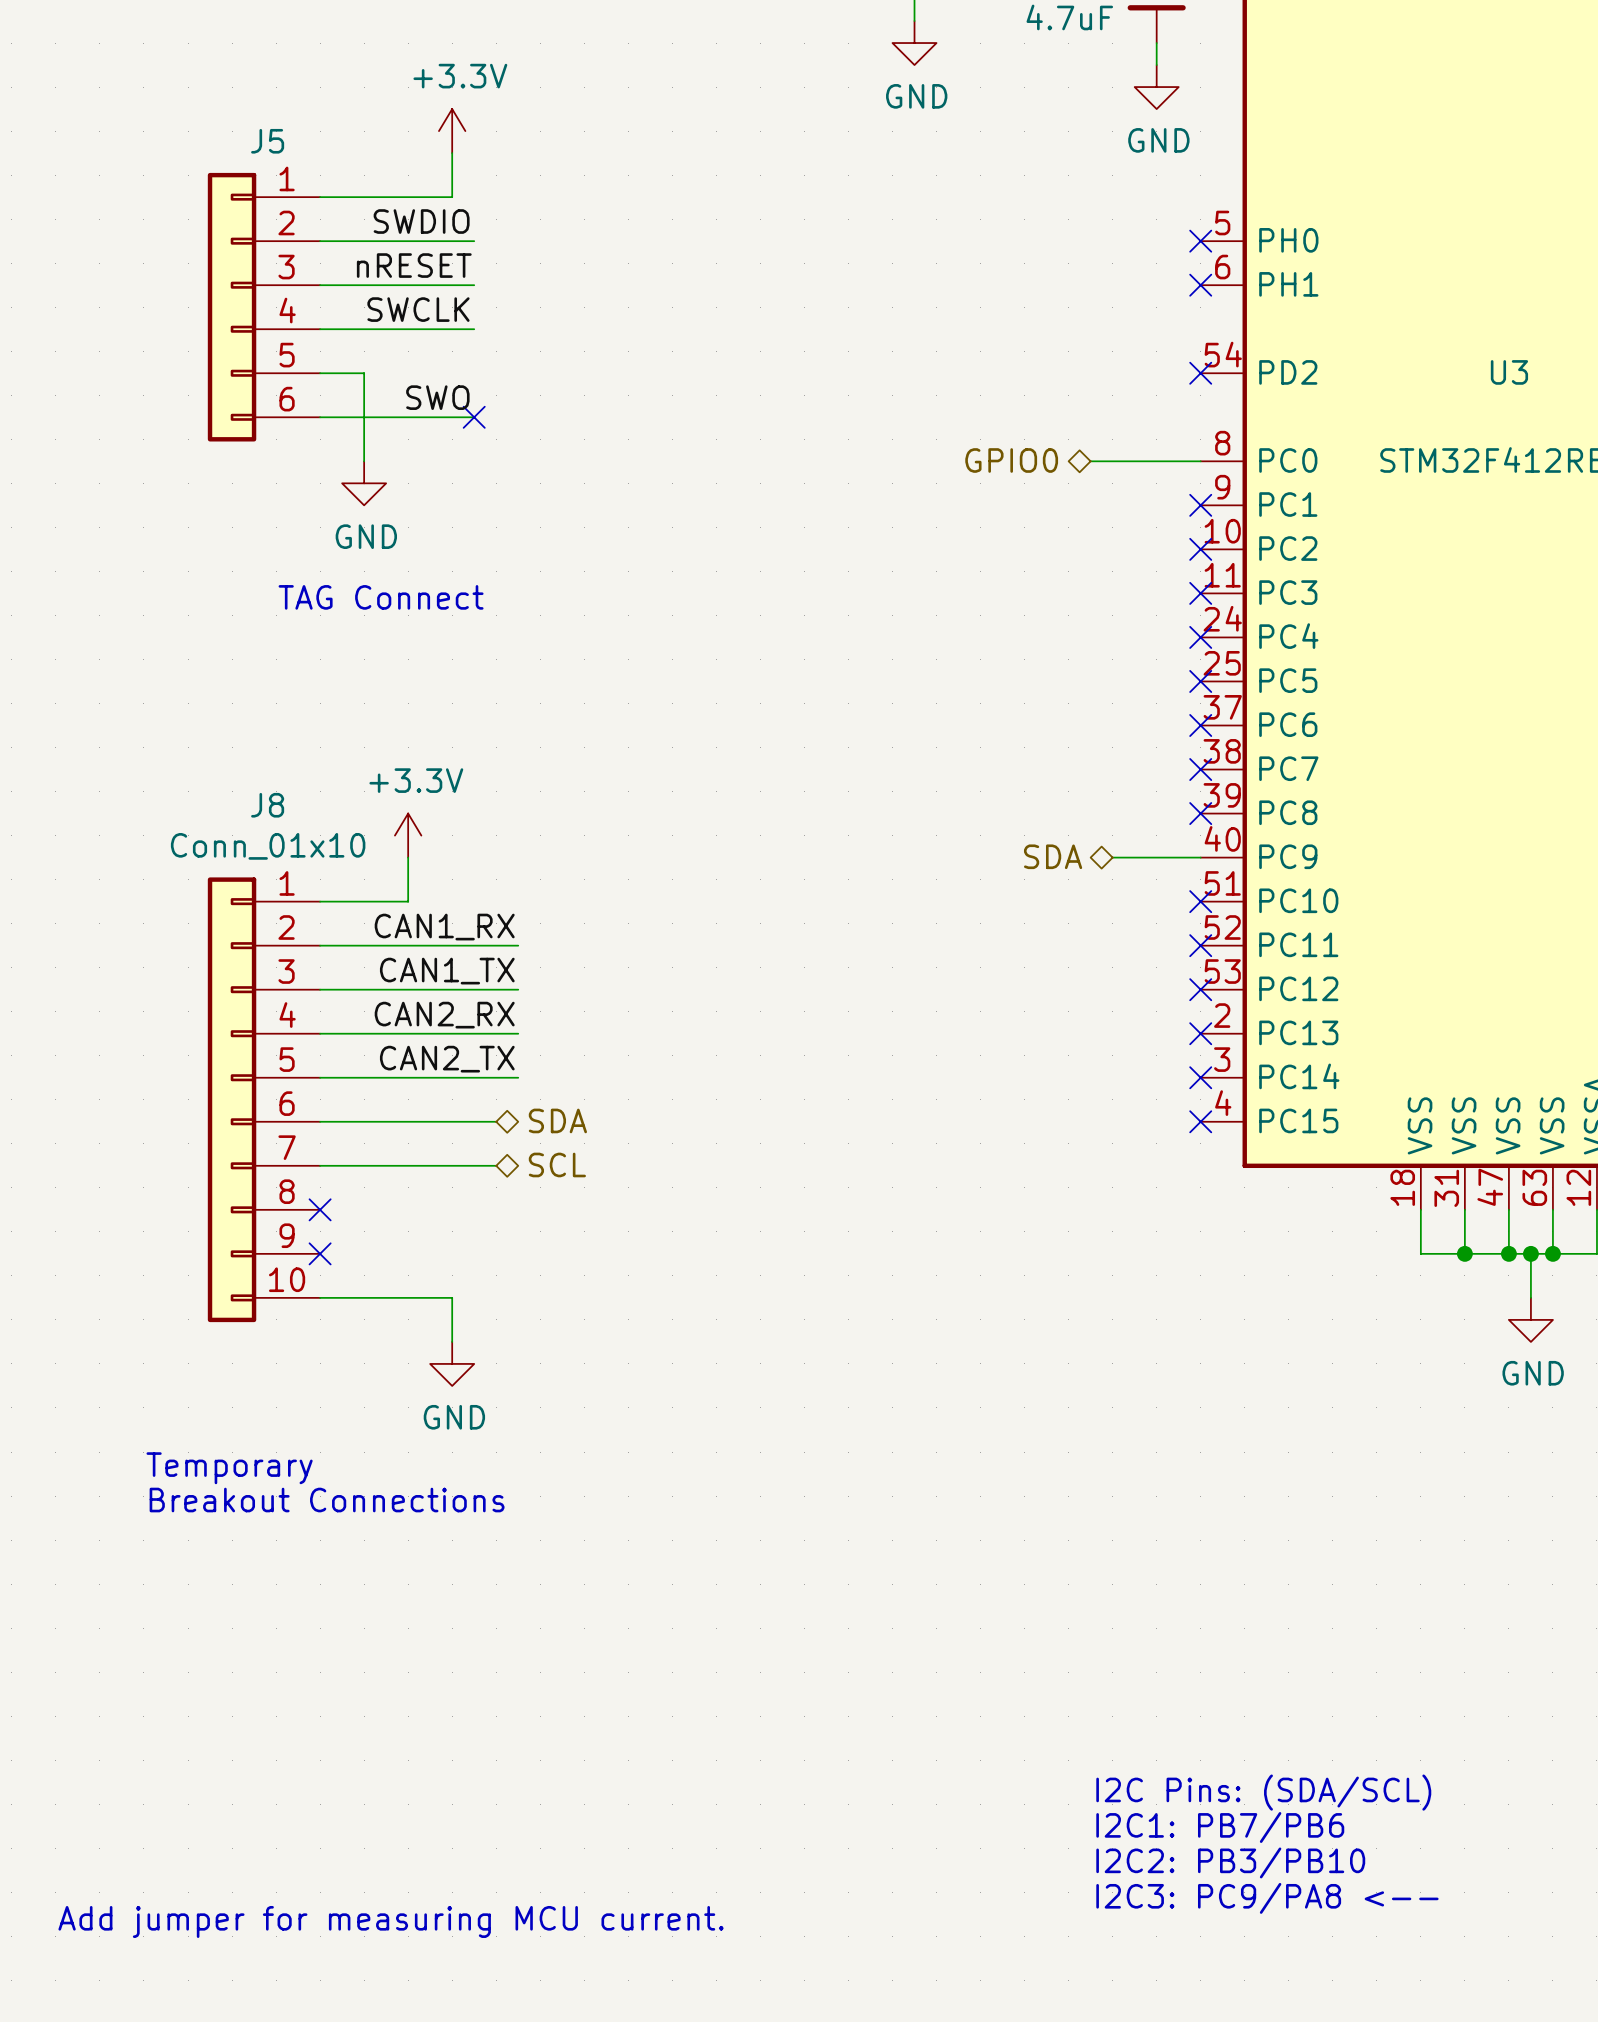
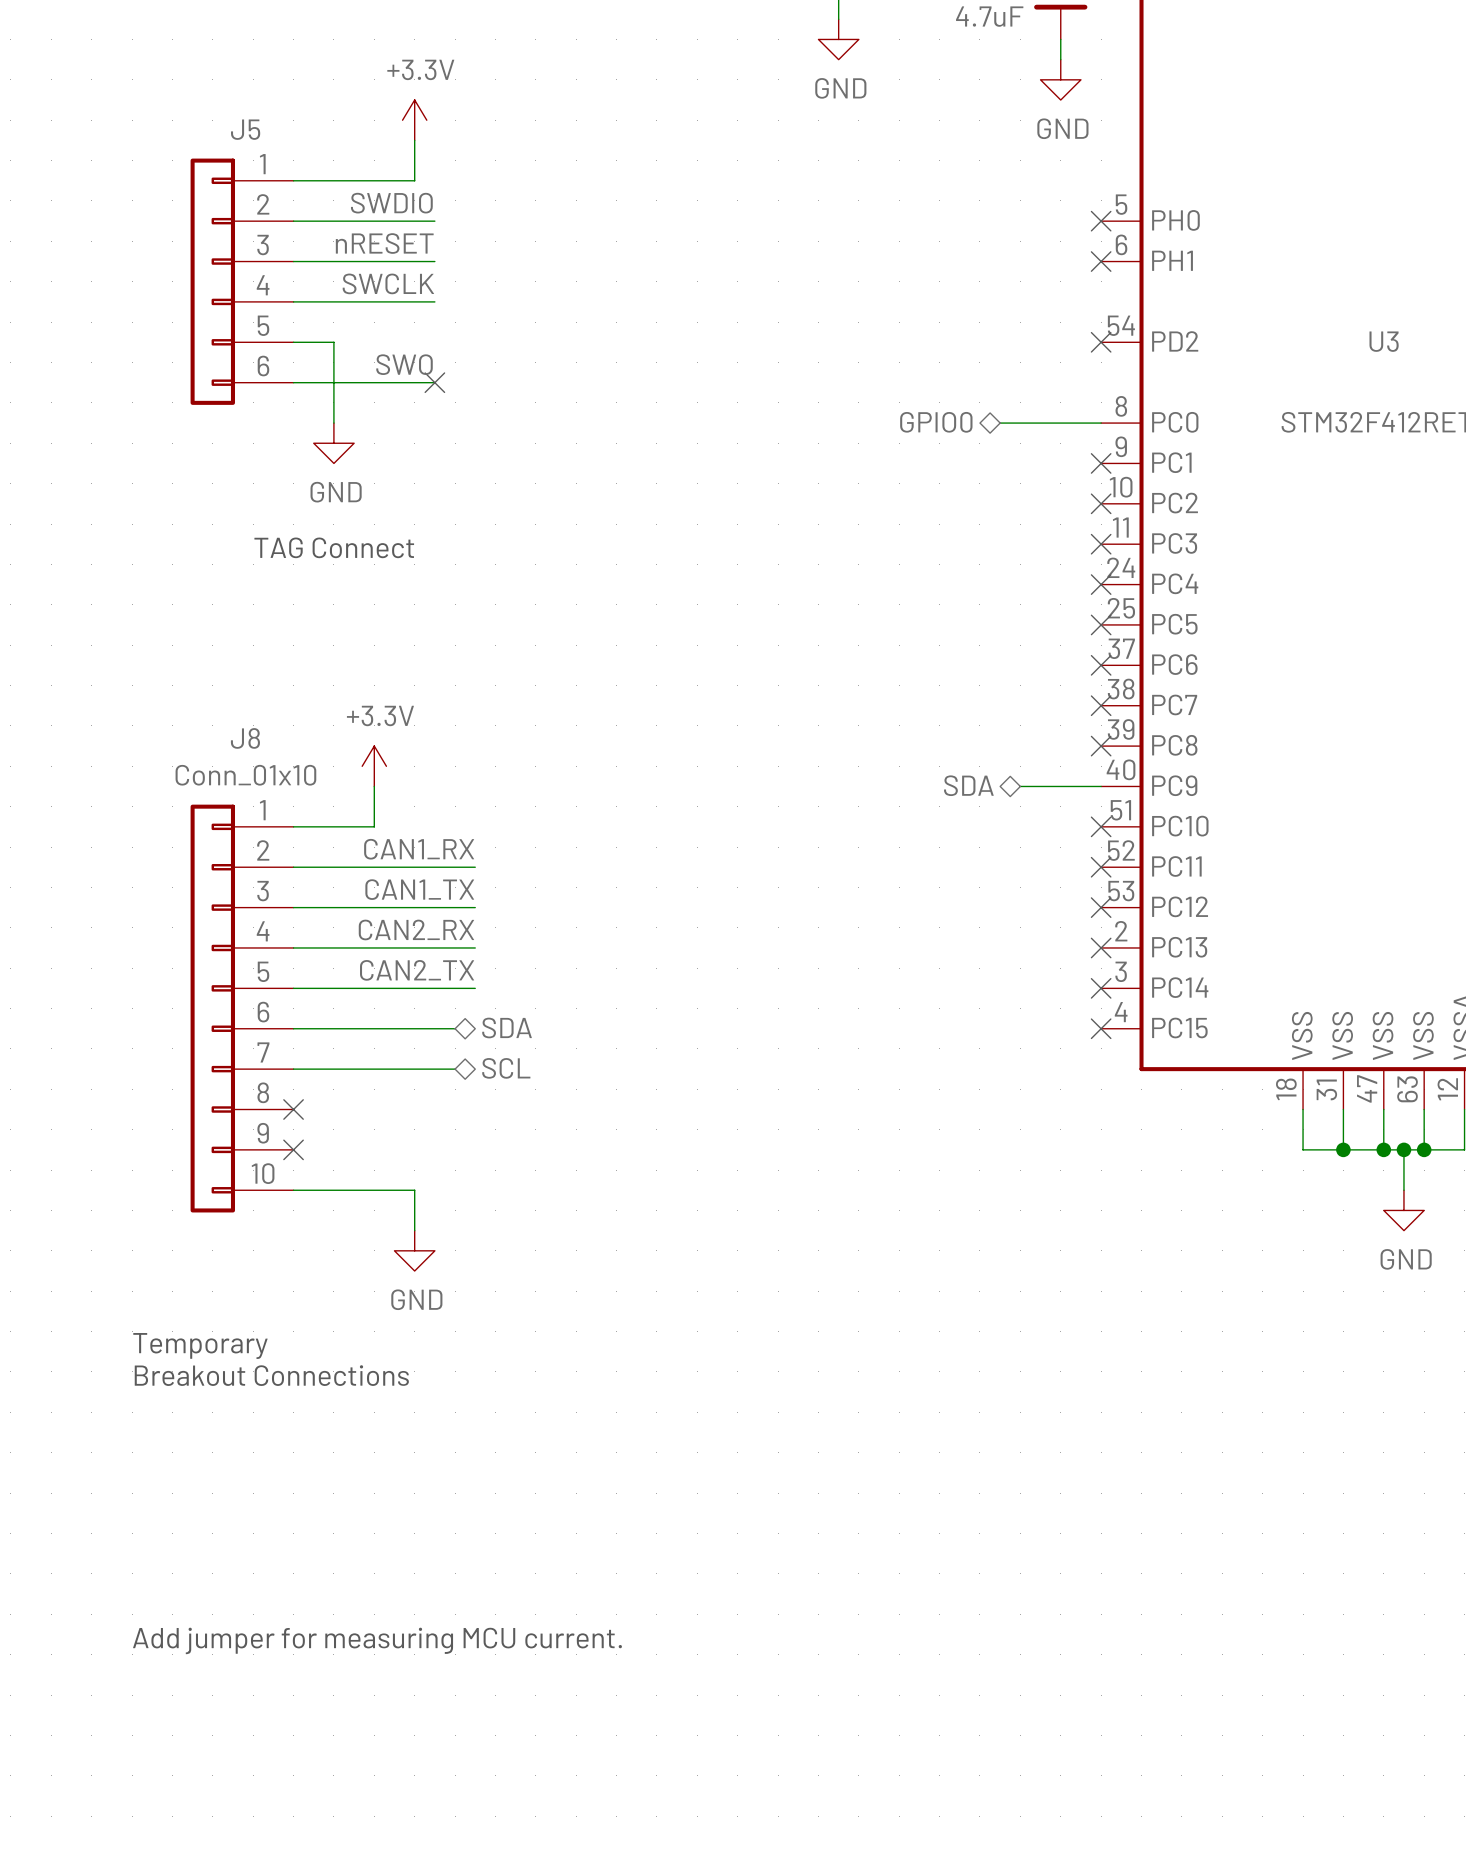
text: I2C Pins: (SDA/SCL) (1263, 1792) -> none
text: I2C1: PB7/PB6 (1220, 1827) -> none
text: I2C2: PB3/PB10 (1230, 1862) -> none
text: I2C3: PC9/PA8 <-- (1267, 1898) -> none
text position: Add jumper for measuring MCU current. (391, 1921) -> Add jumper for measuring MCU current. (377, 1640)

